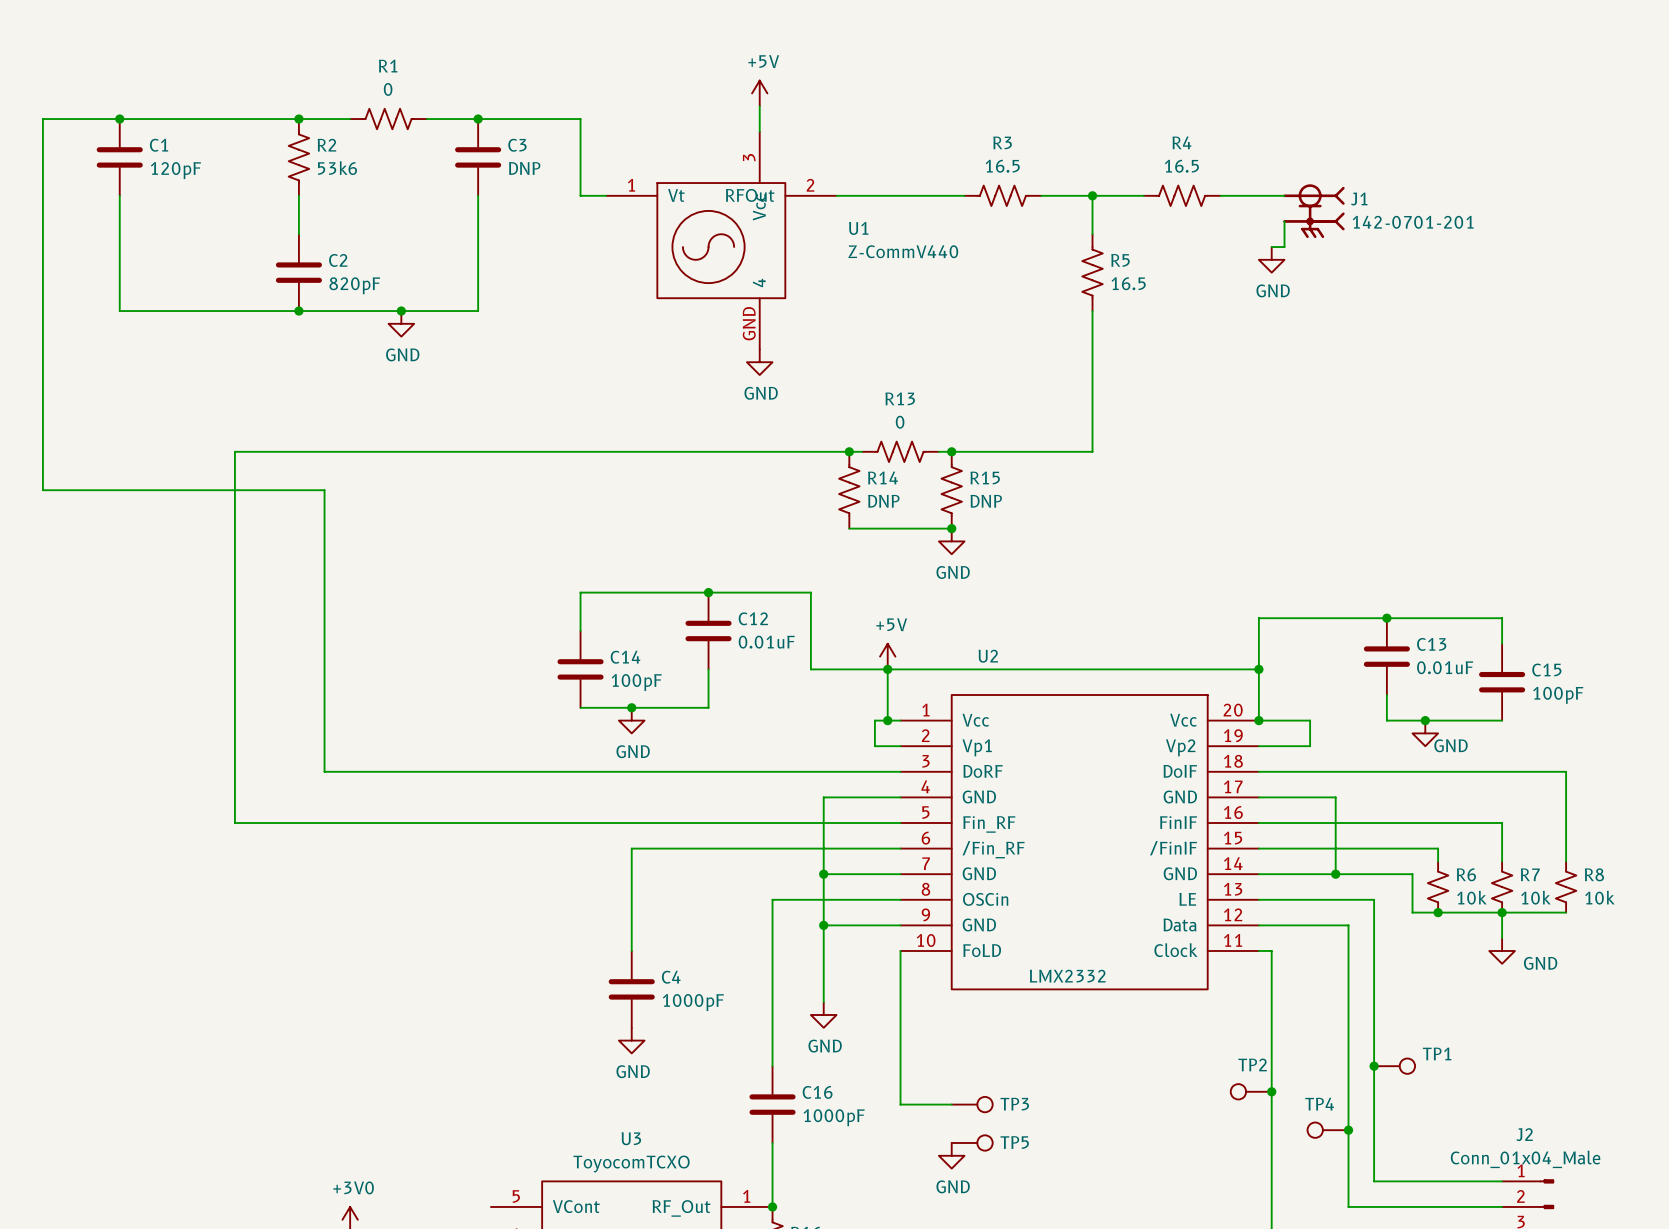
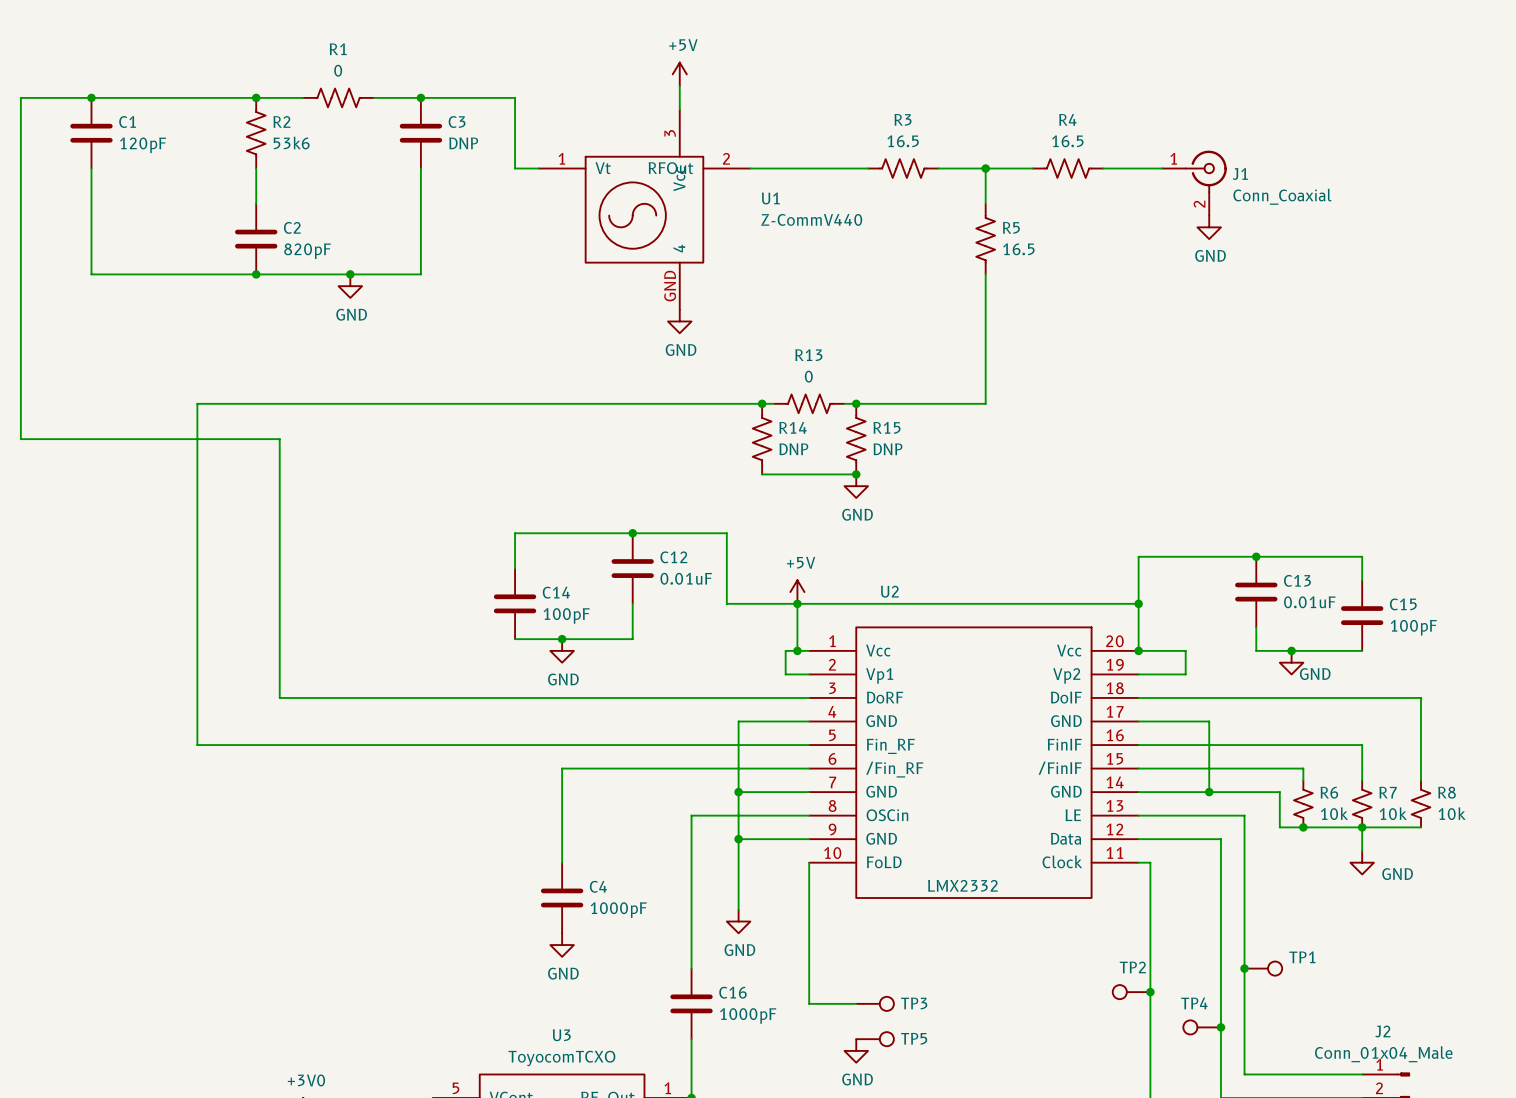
J1 symbol: [1283, 184, 1345, 239] -> [1162, 150, 1227, 216]
wire: (1284, 221) (1284, 247) (1271, 247) -> none
J1 value: 142-0701-201 (1413, 222) -> Conn_Coaxial (1282, 196)
power symbol position: GND (1271, 259) -> GND (1209, 227)

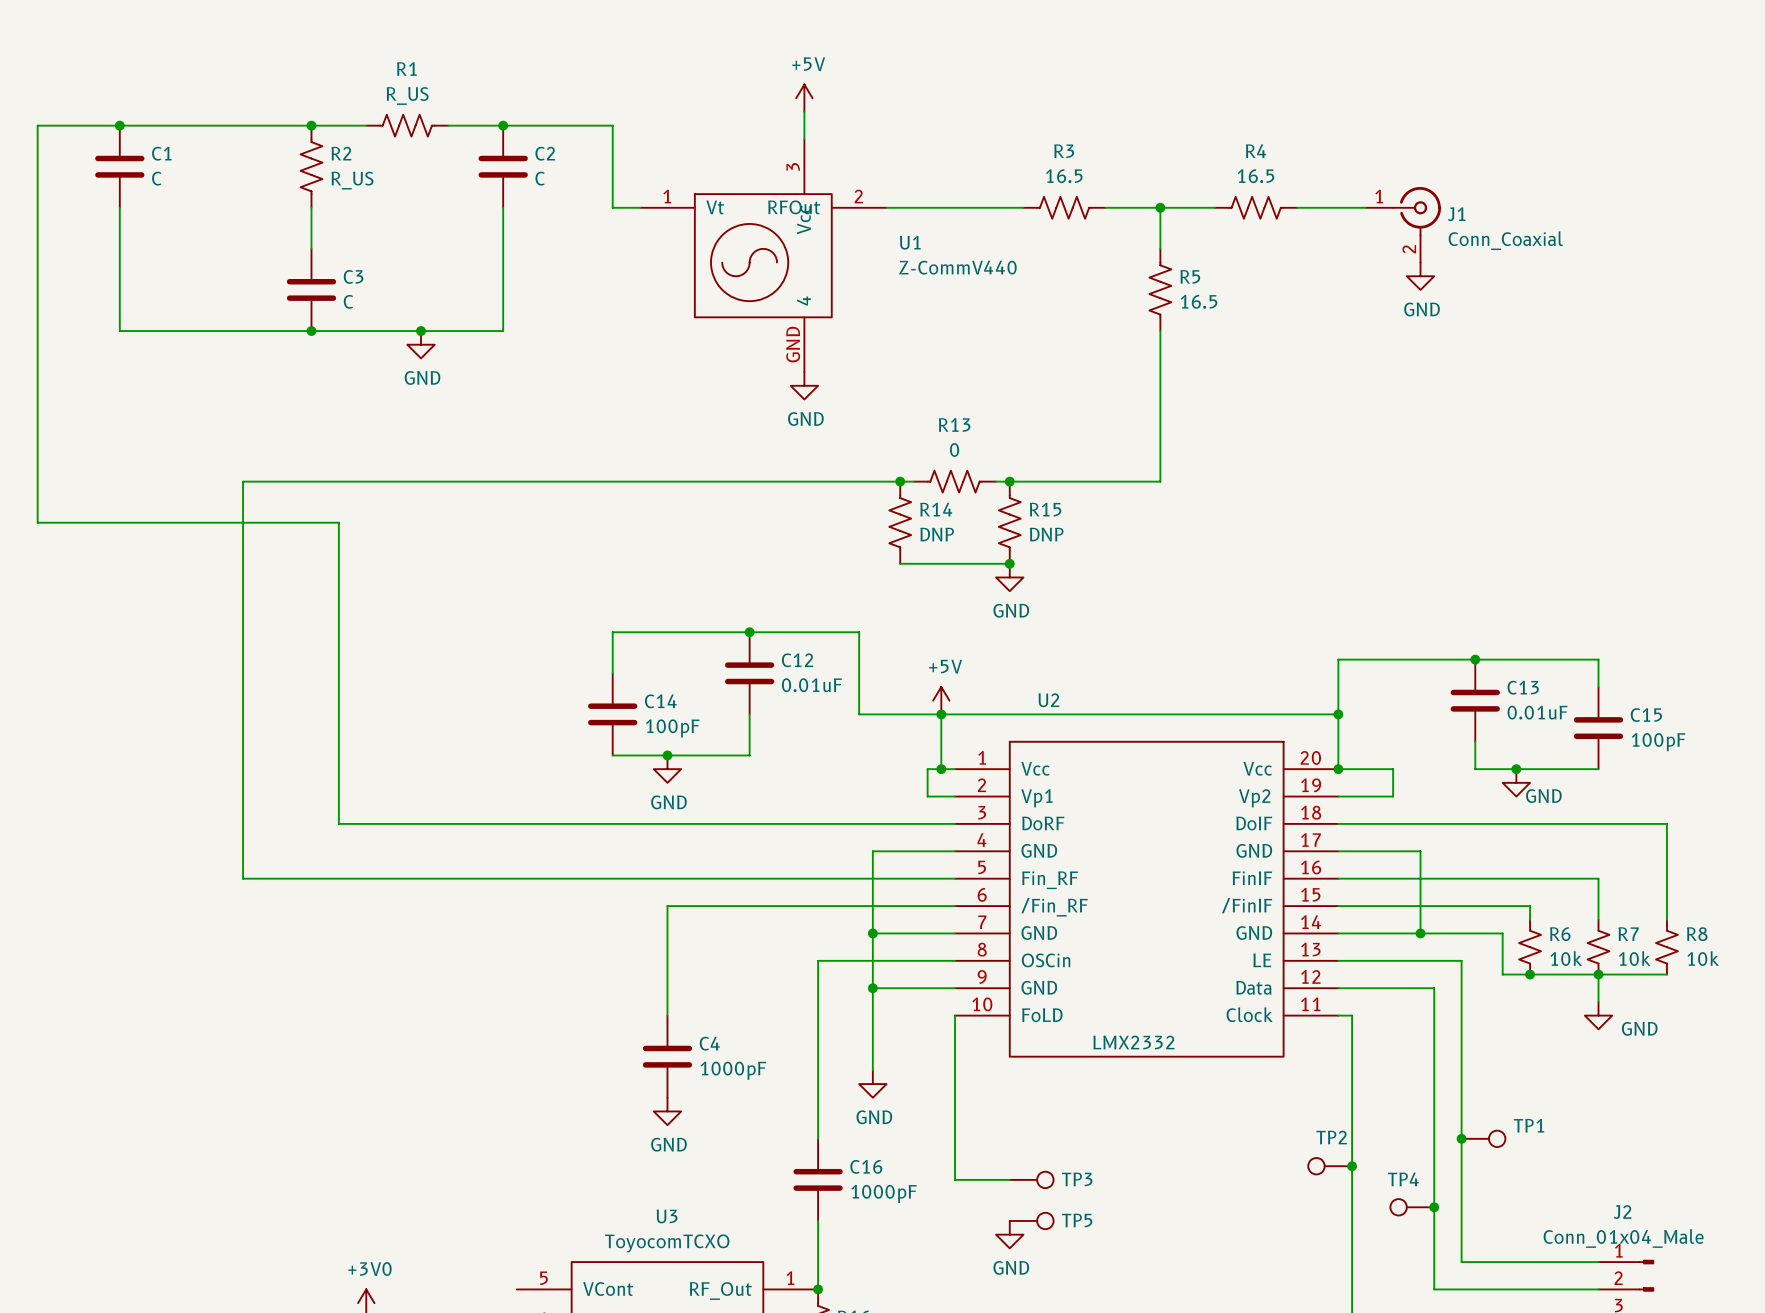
R1 value: 0 (338, 70) -> R_US (407, 95)
C3 name: C3 (457, 122) -> C2 (545, 153)
R2 value: 53k6 (291, 143) -> R_US (352, 180)
C3 value: DNP (463, 143) -> C (540, 178)
C1 value: 120pF (143, 145) -> C (156, 178)
C2 name: C2 (292, 227) -> C3 (353, 276)
C2 value: 820pF (307, 251) -> C (348, 301)

